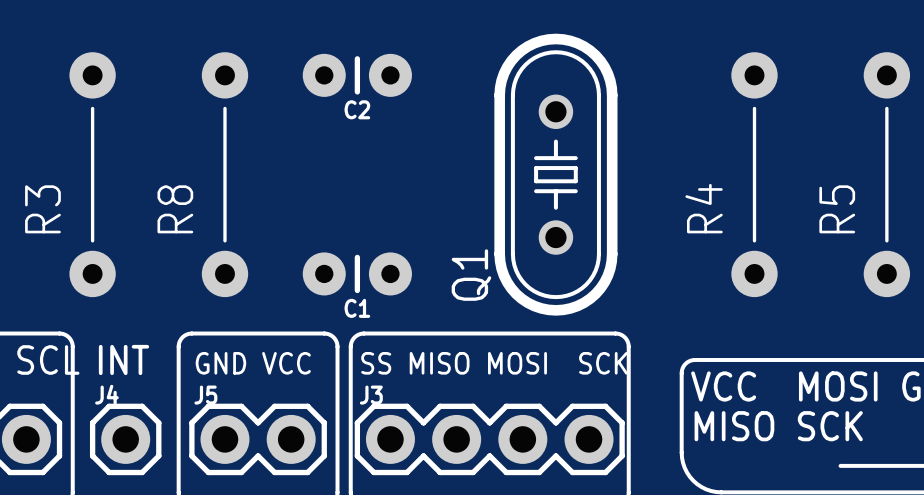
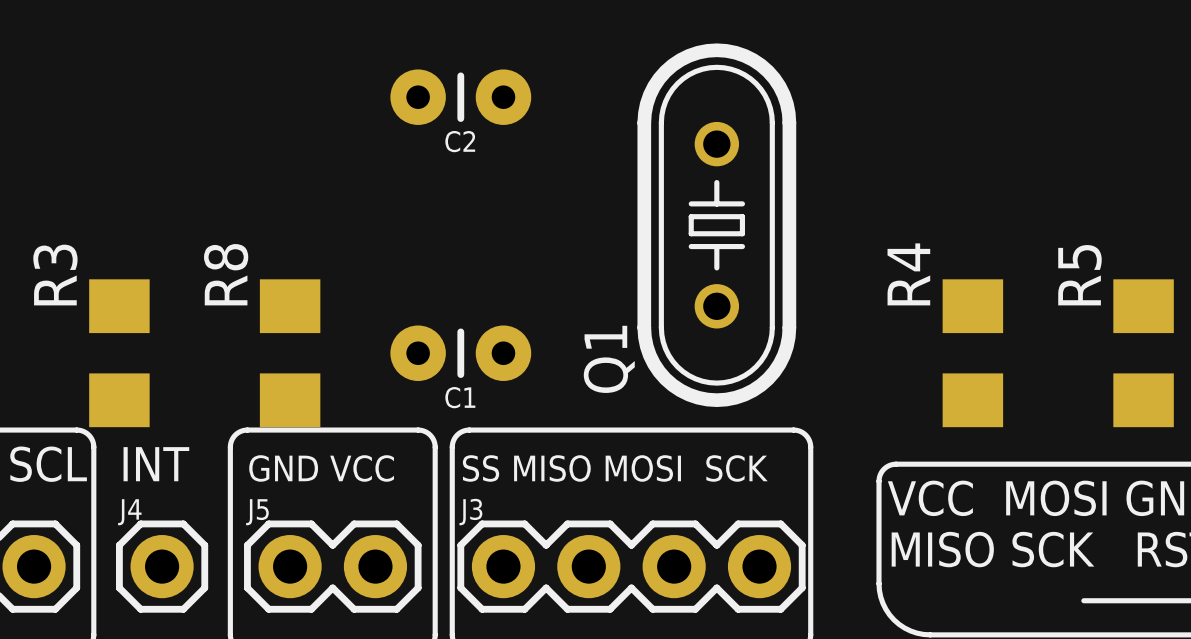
R3 footprint: [69, 52, 116, 298] -> [89, 279, 150, 428]
R8 footprint: [201, 52, 249, 298] -> [259, 279, 321, 428]
R4 footprint: [731, 52, 778, 298] -> [942, 279, 1004, 428]
R5 footprint: [863, 52, 911, 298] -> [1113, 279, 1174, 428]

